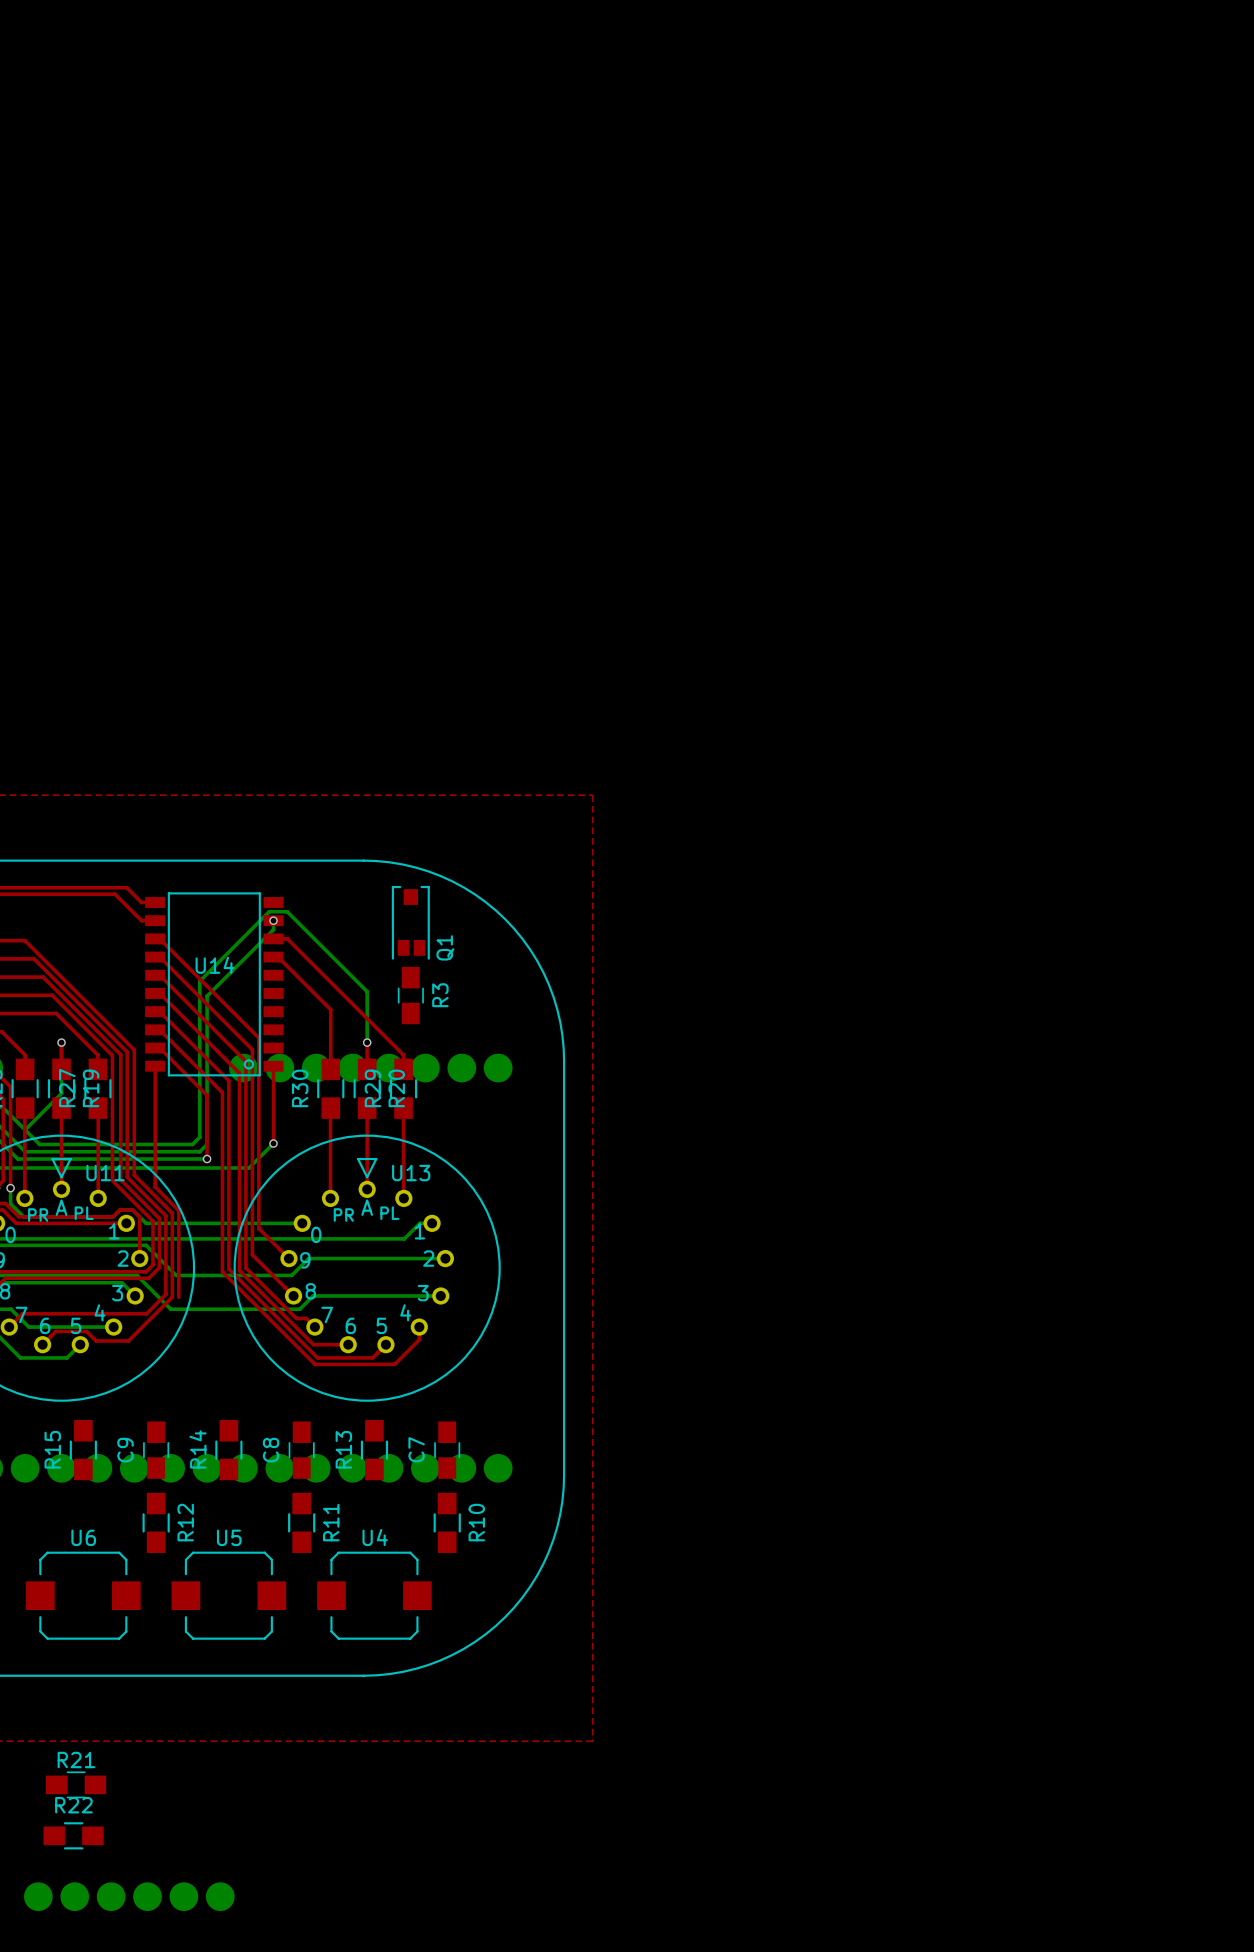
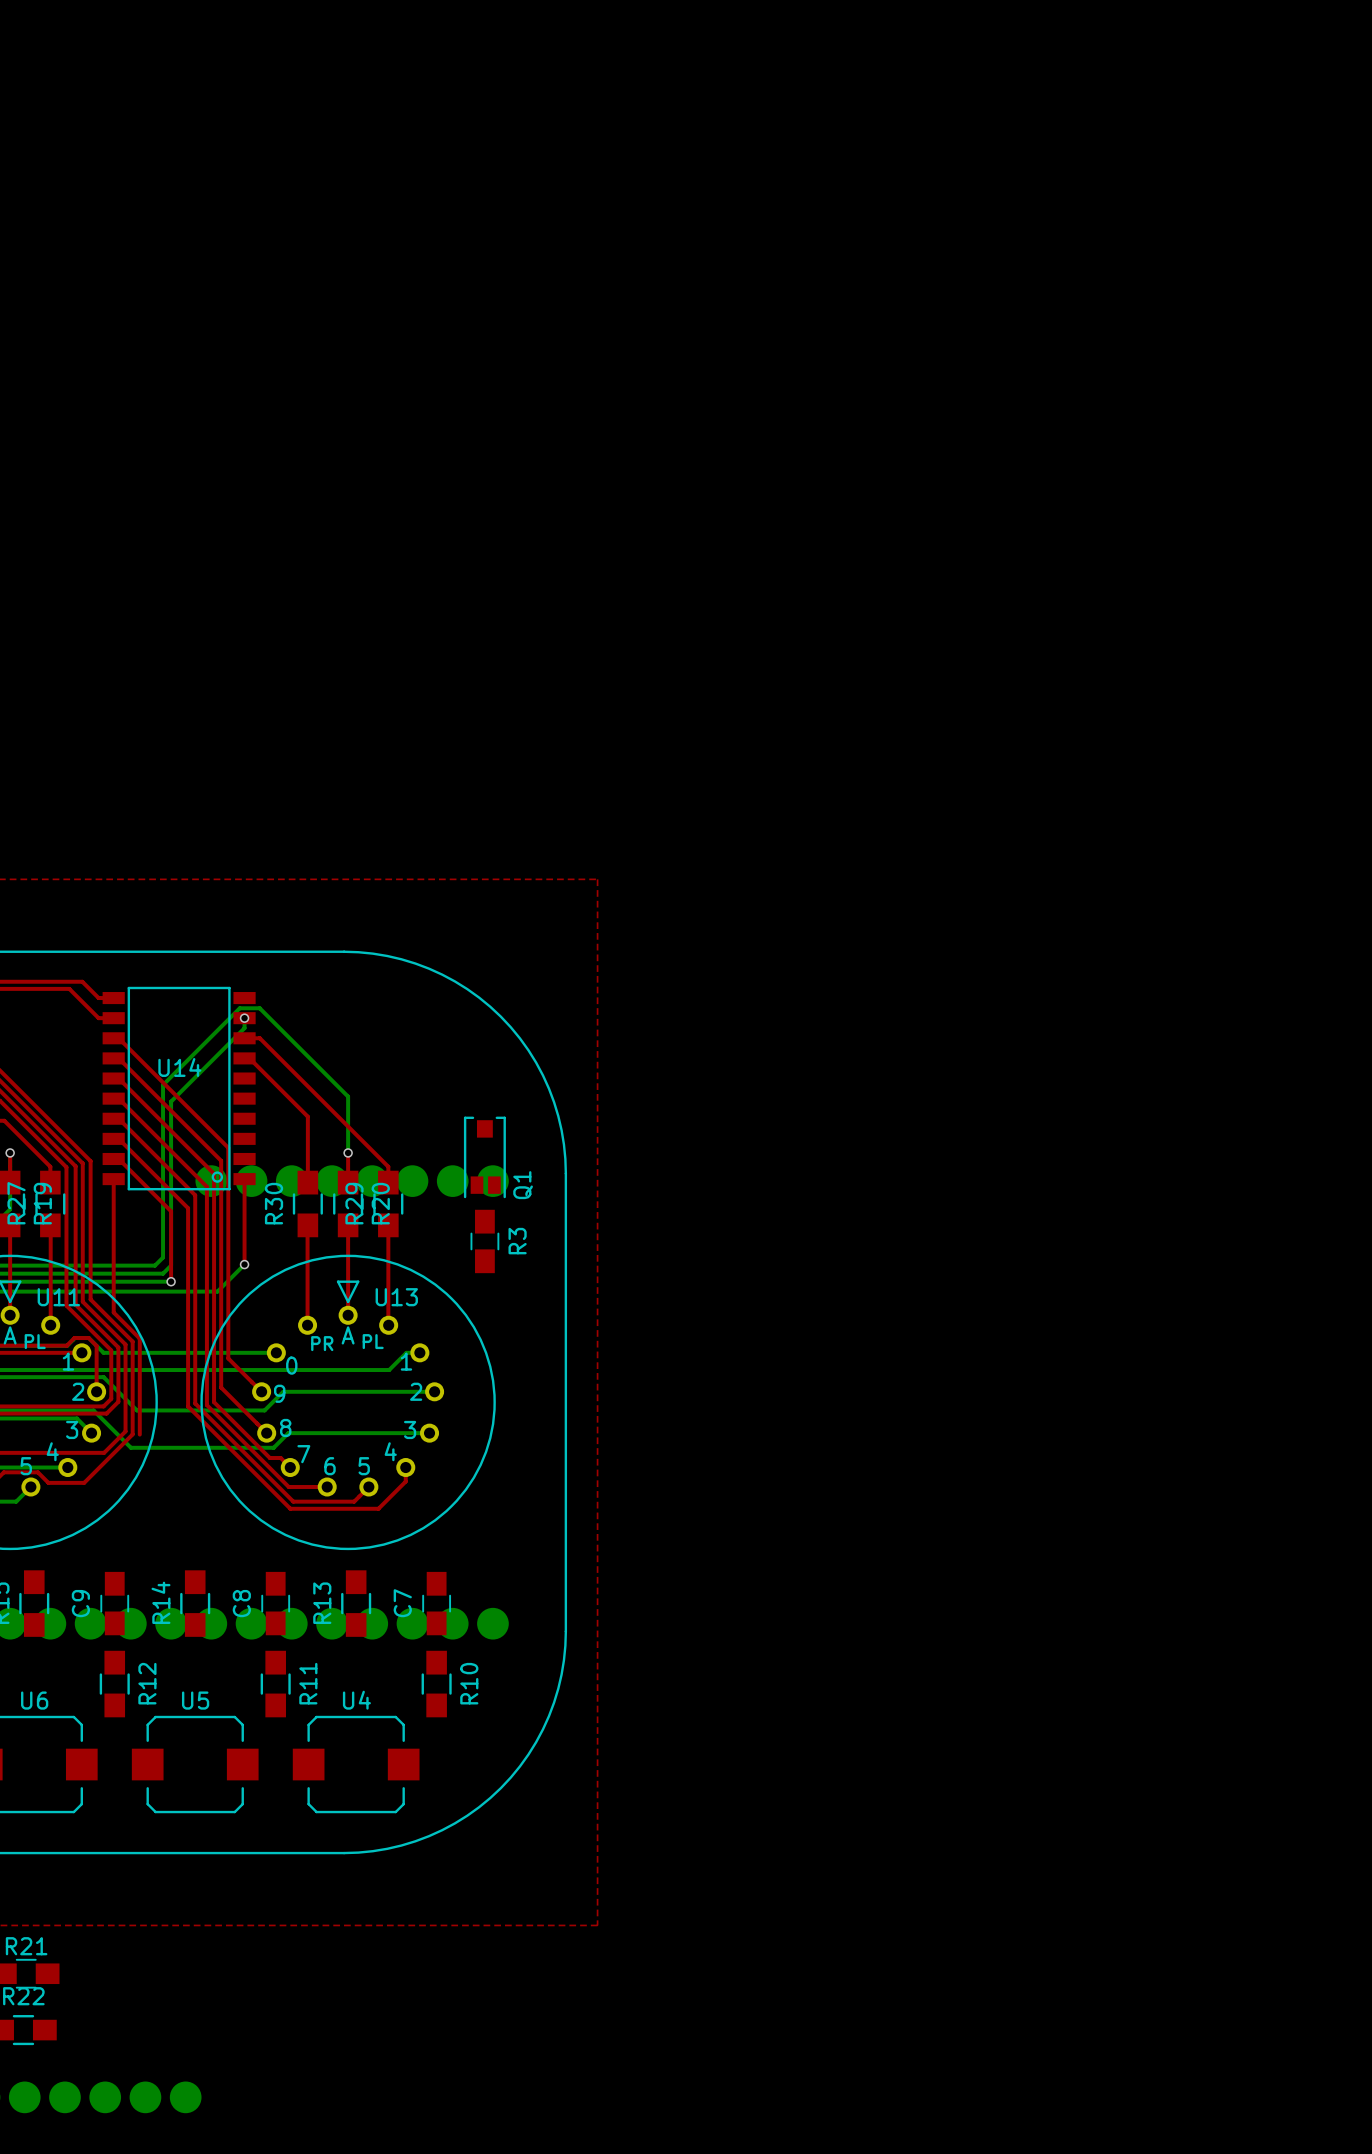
Q1 position: (410, 922) -> (484, 1157)
R3 position: (410, 995) -> (484, 1241)

